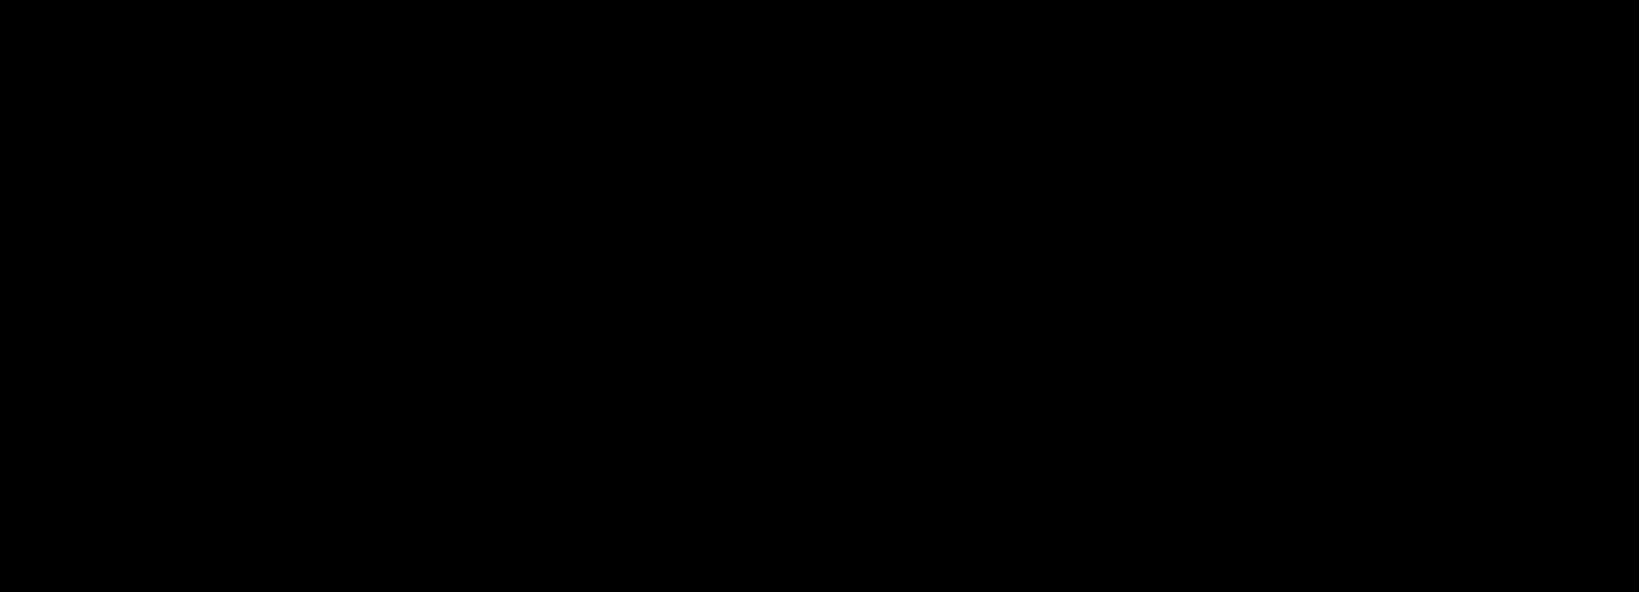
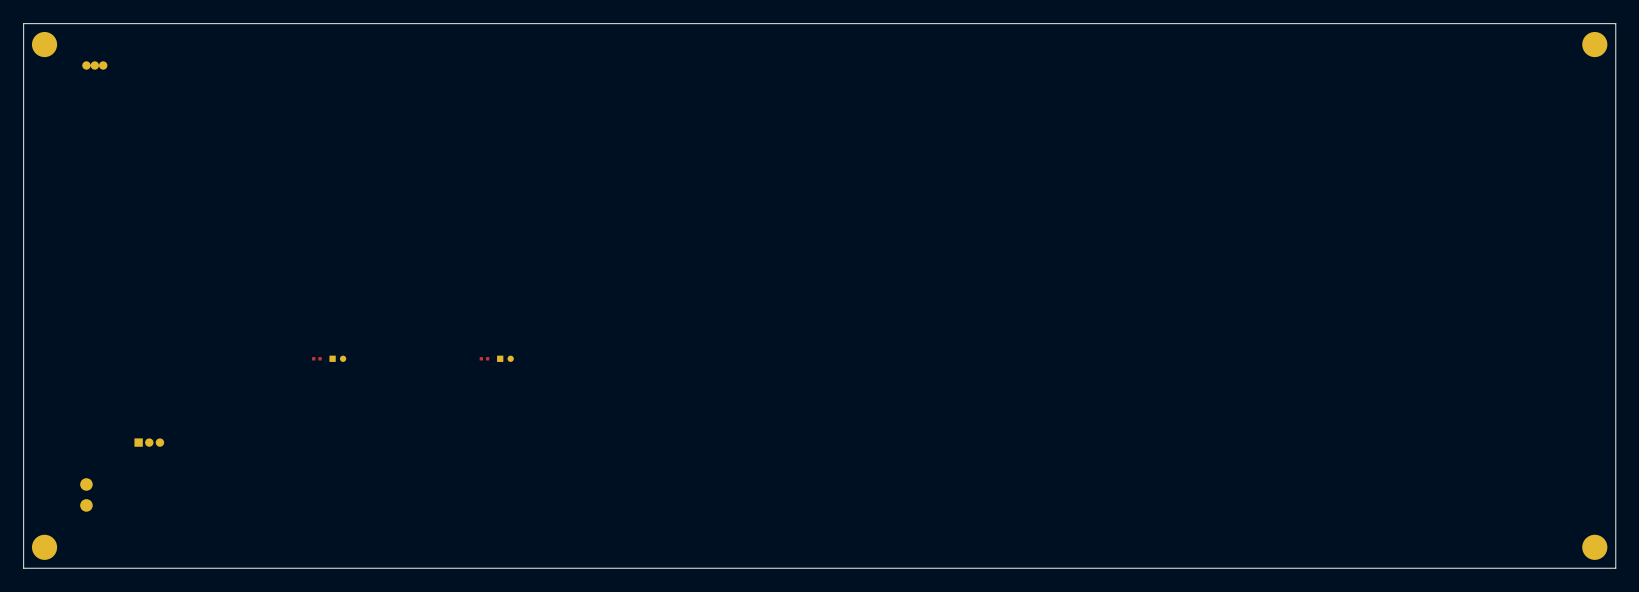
board edge: none -> (23, 23) (1615, 23) (1615, 568) (23, 568) (23, 23)
part: none -> (44, 44)
part: none -> (1594, 44)
part: none -> (94, 65)
part: none -> (316, 358)
part: none -> (337, 358)
part: none -> (484, 358)
part: none -> (505, 358)
part: none -> (149, 442)
part: none -> (86, 494)
part: none -> (44, 547)
part: none -> (1594, 547)

